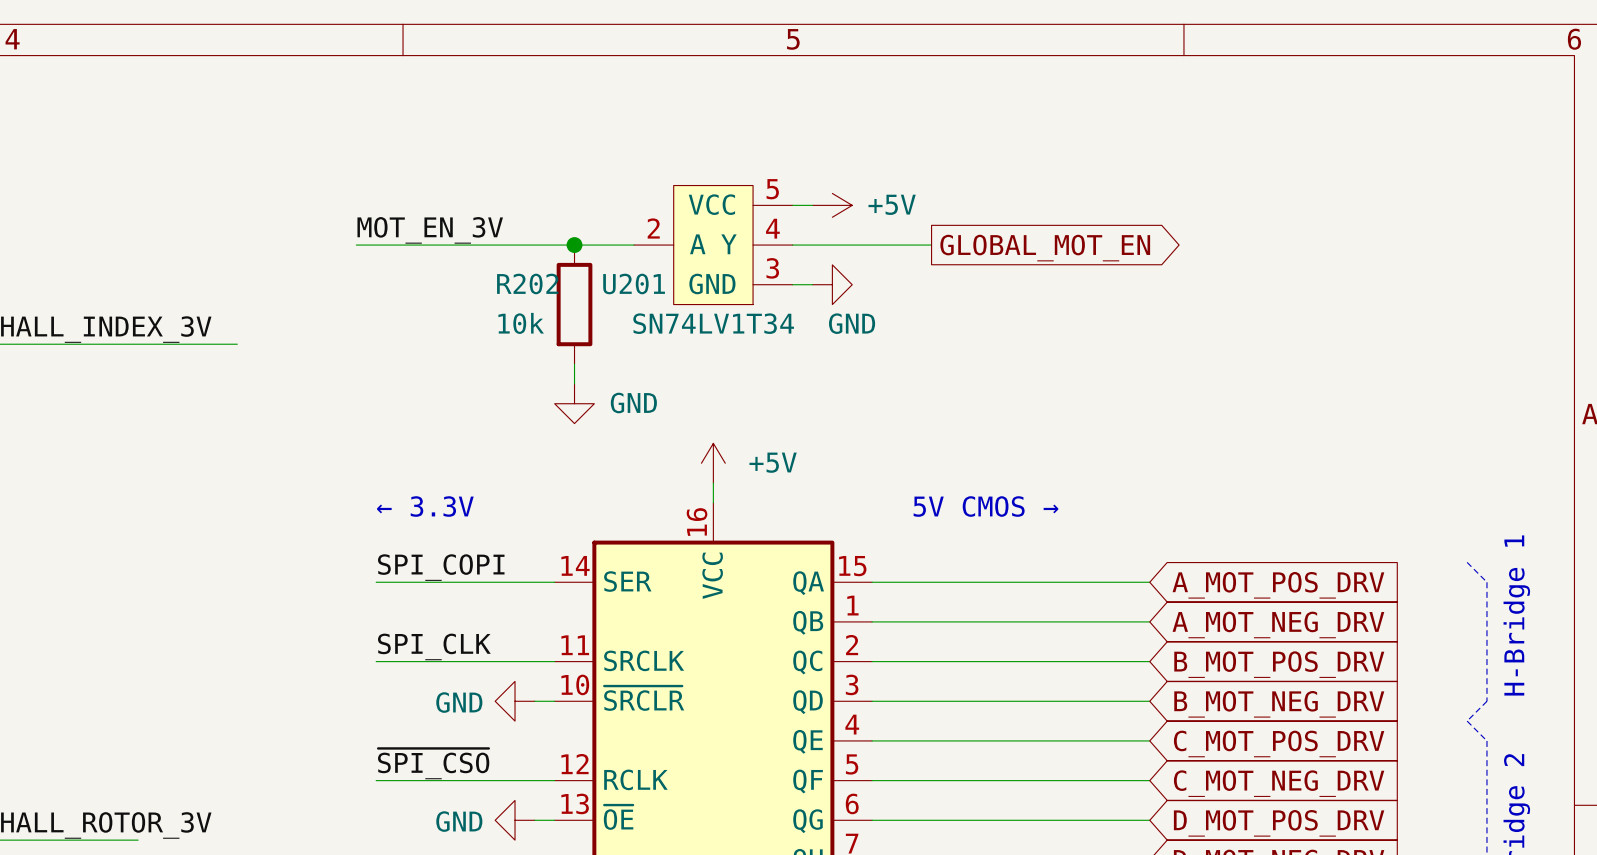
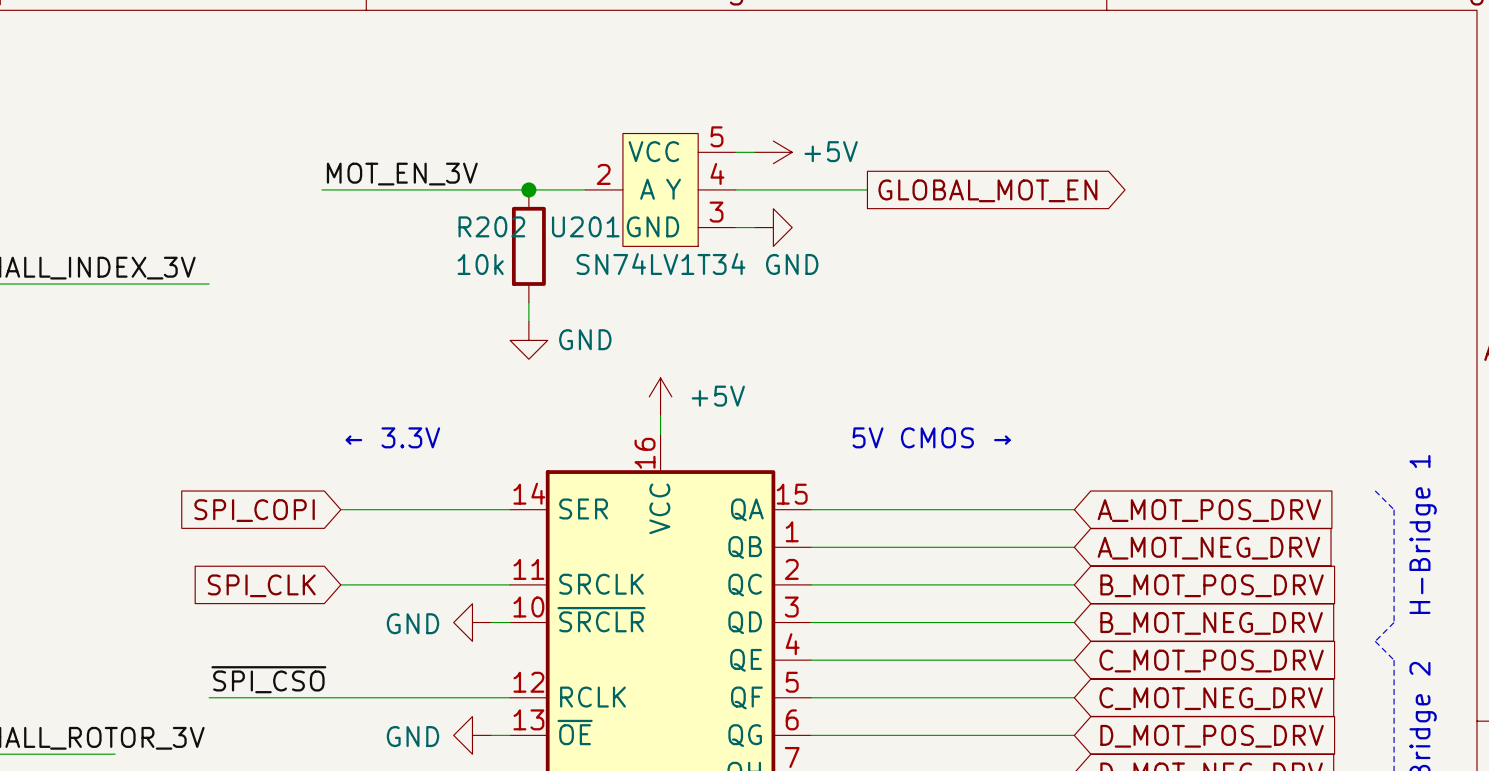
label: SPI_COPI (441, 567) -> none
global label: none -> SPI_COPI (254, 510)
label: SPI_CLK (434, 646) -> none
global label: none -> SPI_CLK (261, 585)
label position: ~{SPI_CSO} (433, 763) -> ~{SPI_CSO} (268, 679)
wire: none -> (209, 697) (340, 697)

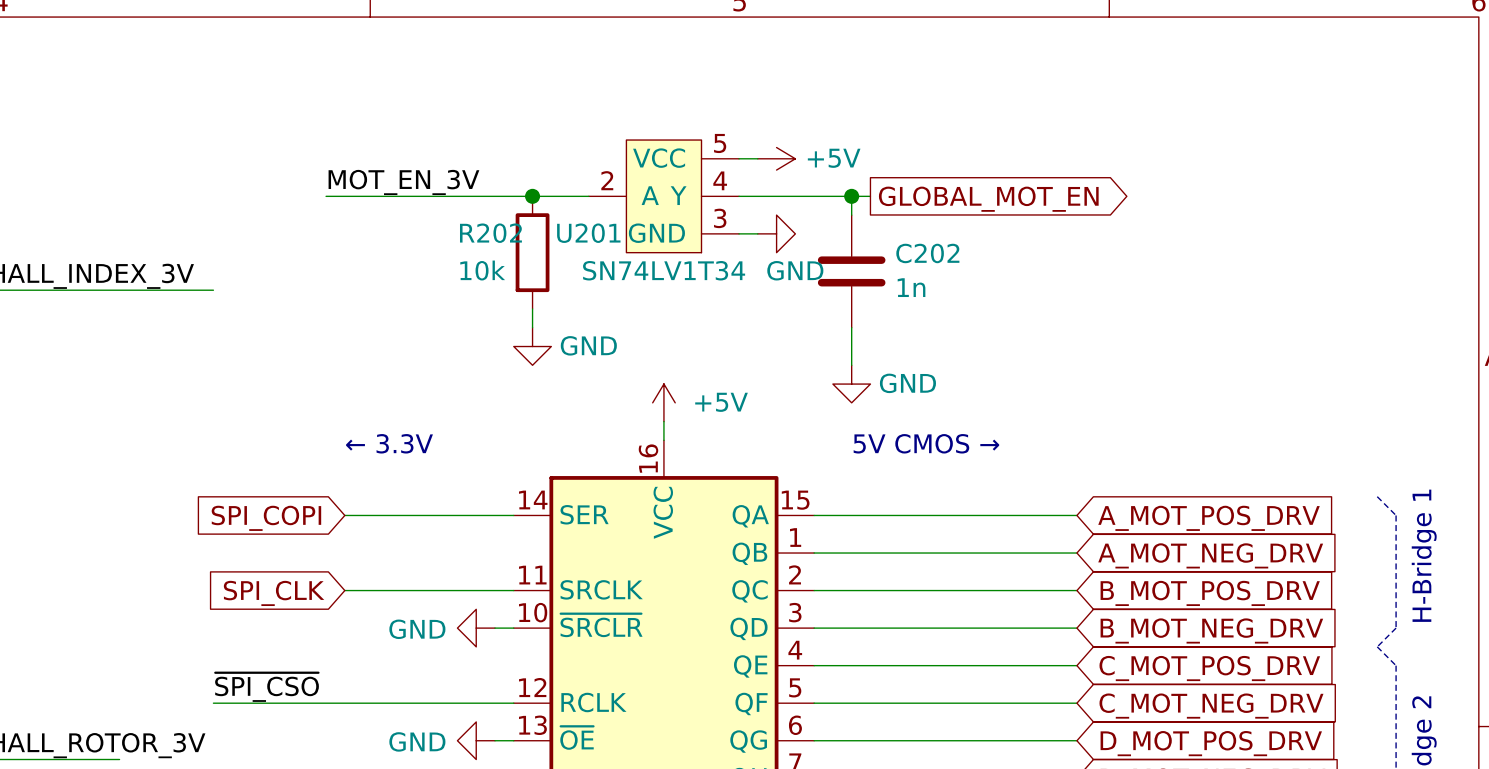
wire: none -> (851, 196) (851, 215)
junction: none -> (851, 196)
C202: none -> 1n (851, 271)
wire: none -> (851, 327) (851, 365)
power symbol: none -> GND (851, 384)

